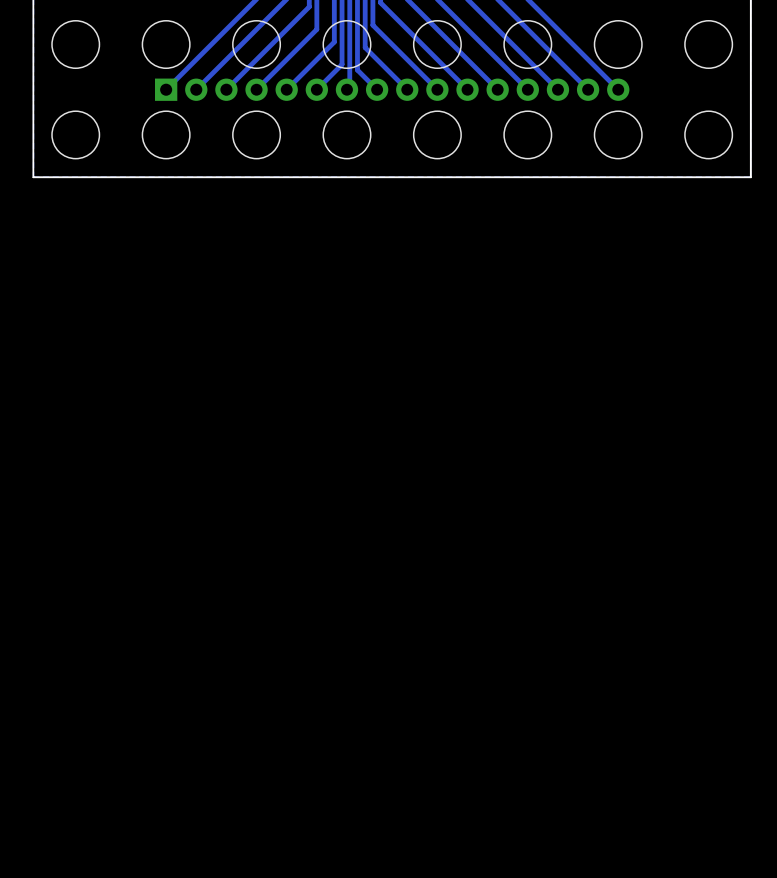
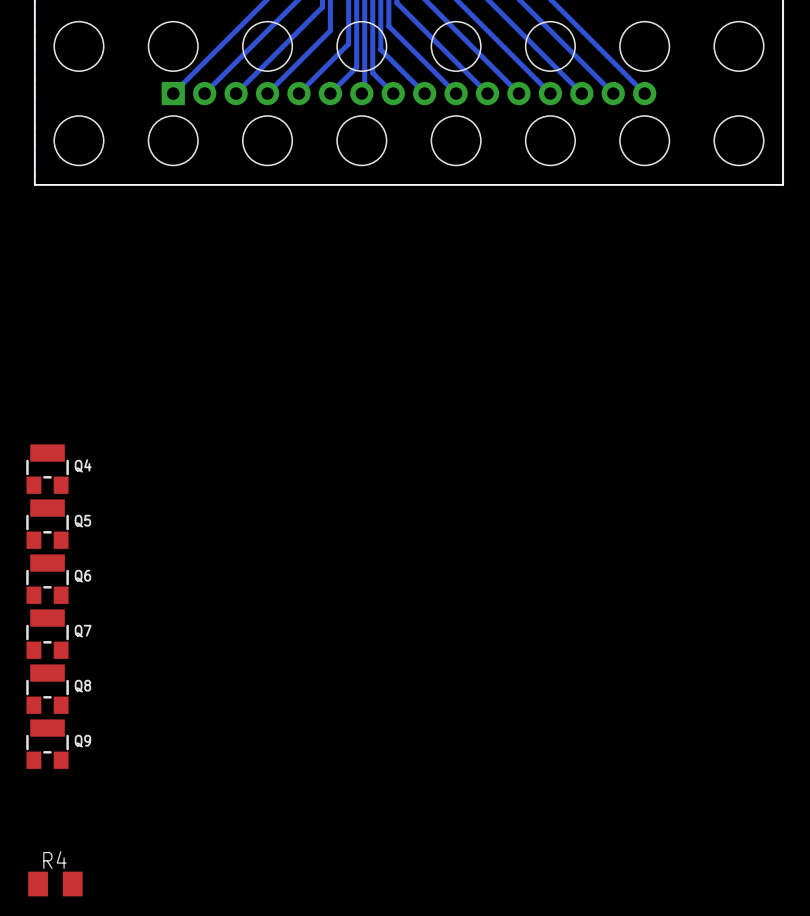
Q4: none -> (47, 469)
Q5: none -> (47, 524)
Q6: none -> (47, 579)
Q7: none -> (47, 634)
Q8: none -> (47, 689)
Q9: none -> (47, 744)
R4: none -> (55, 884)

